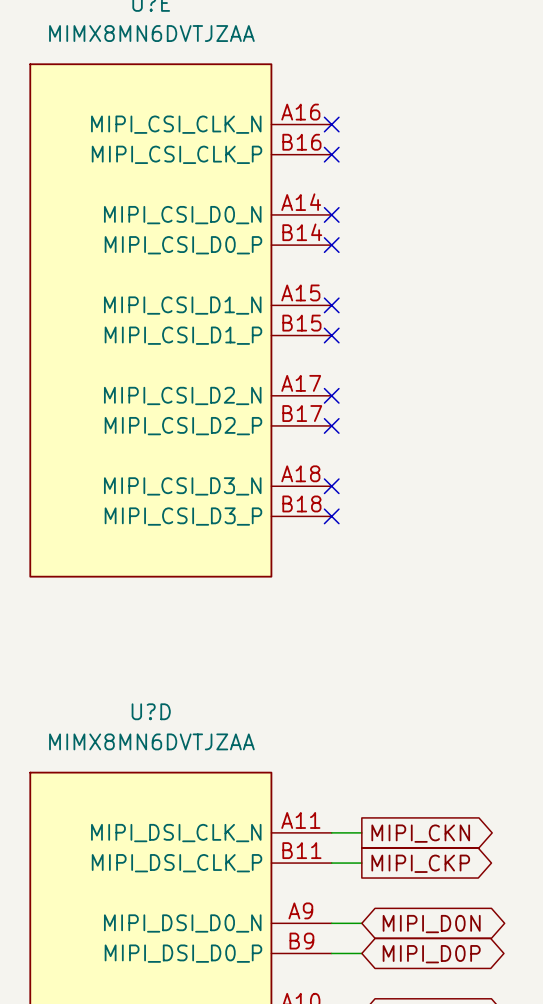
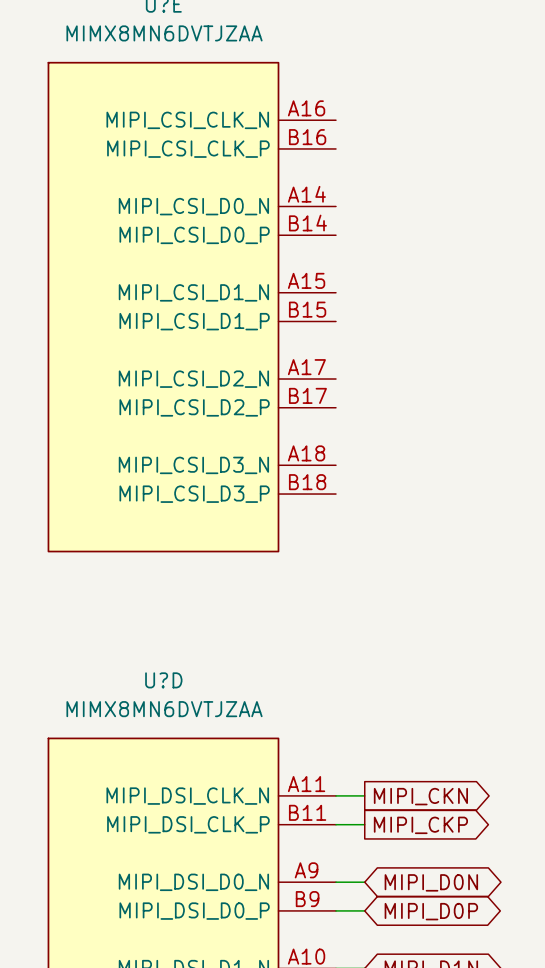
no-connect mark: (331, 124) -> none
no-connect mark: (331, 154) -> none
no-connect mark: (331, 214) -> none
no-connect mark: (331, 245) -> none
no-connect mark: (331, 305) -> none
no-connect mark: (331, 335) -> none
no-connect mark: (331, 395) -> none
no-connect mark: (331, 425) -> none
no-connect mark: (331, 486) -> none
no-connect mark: (331, 516) -> none

